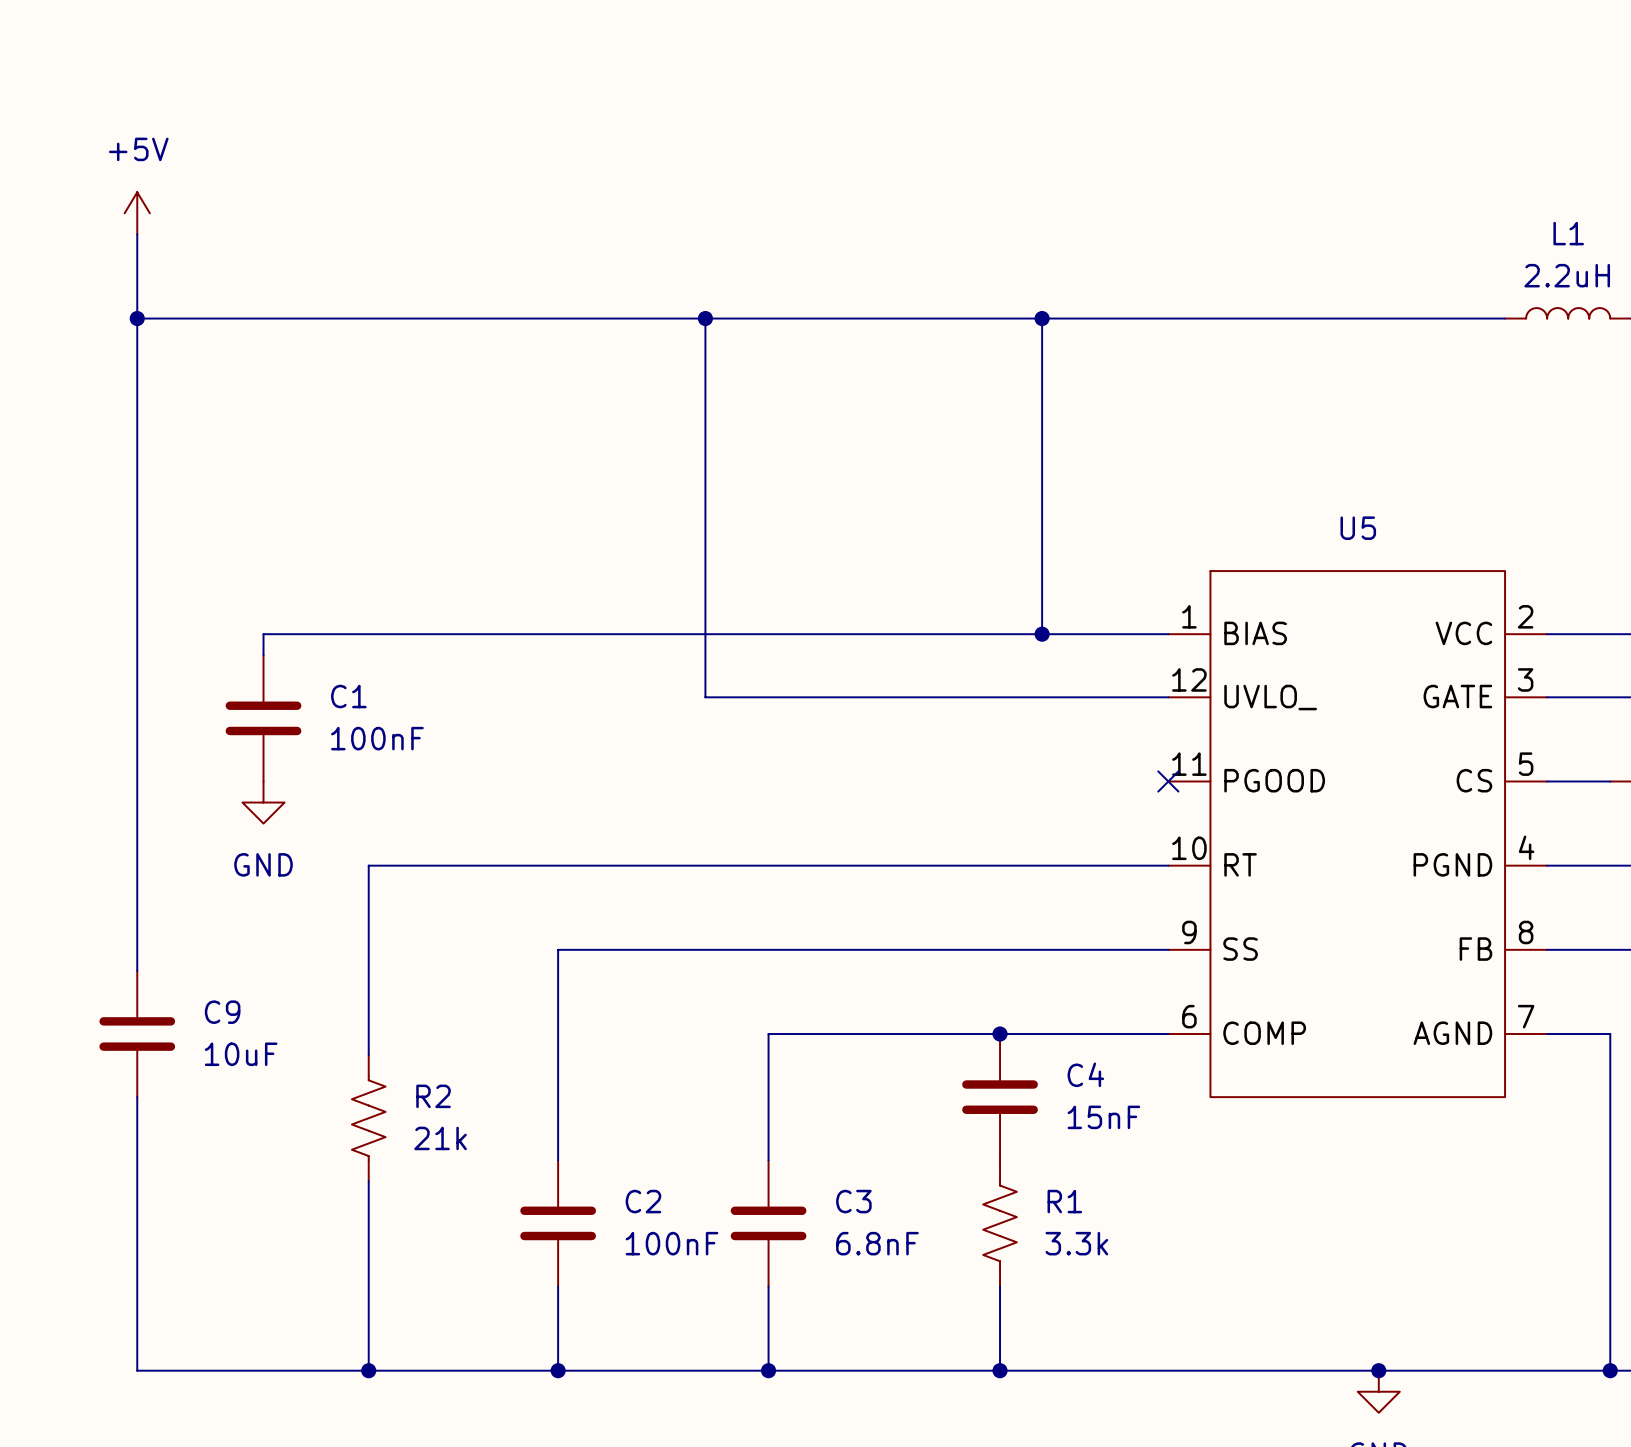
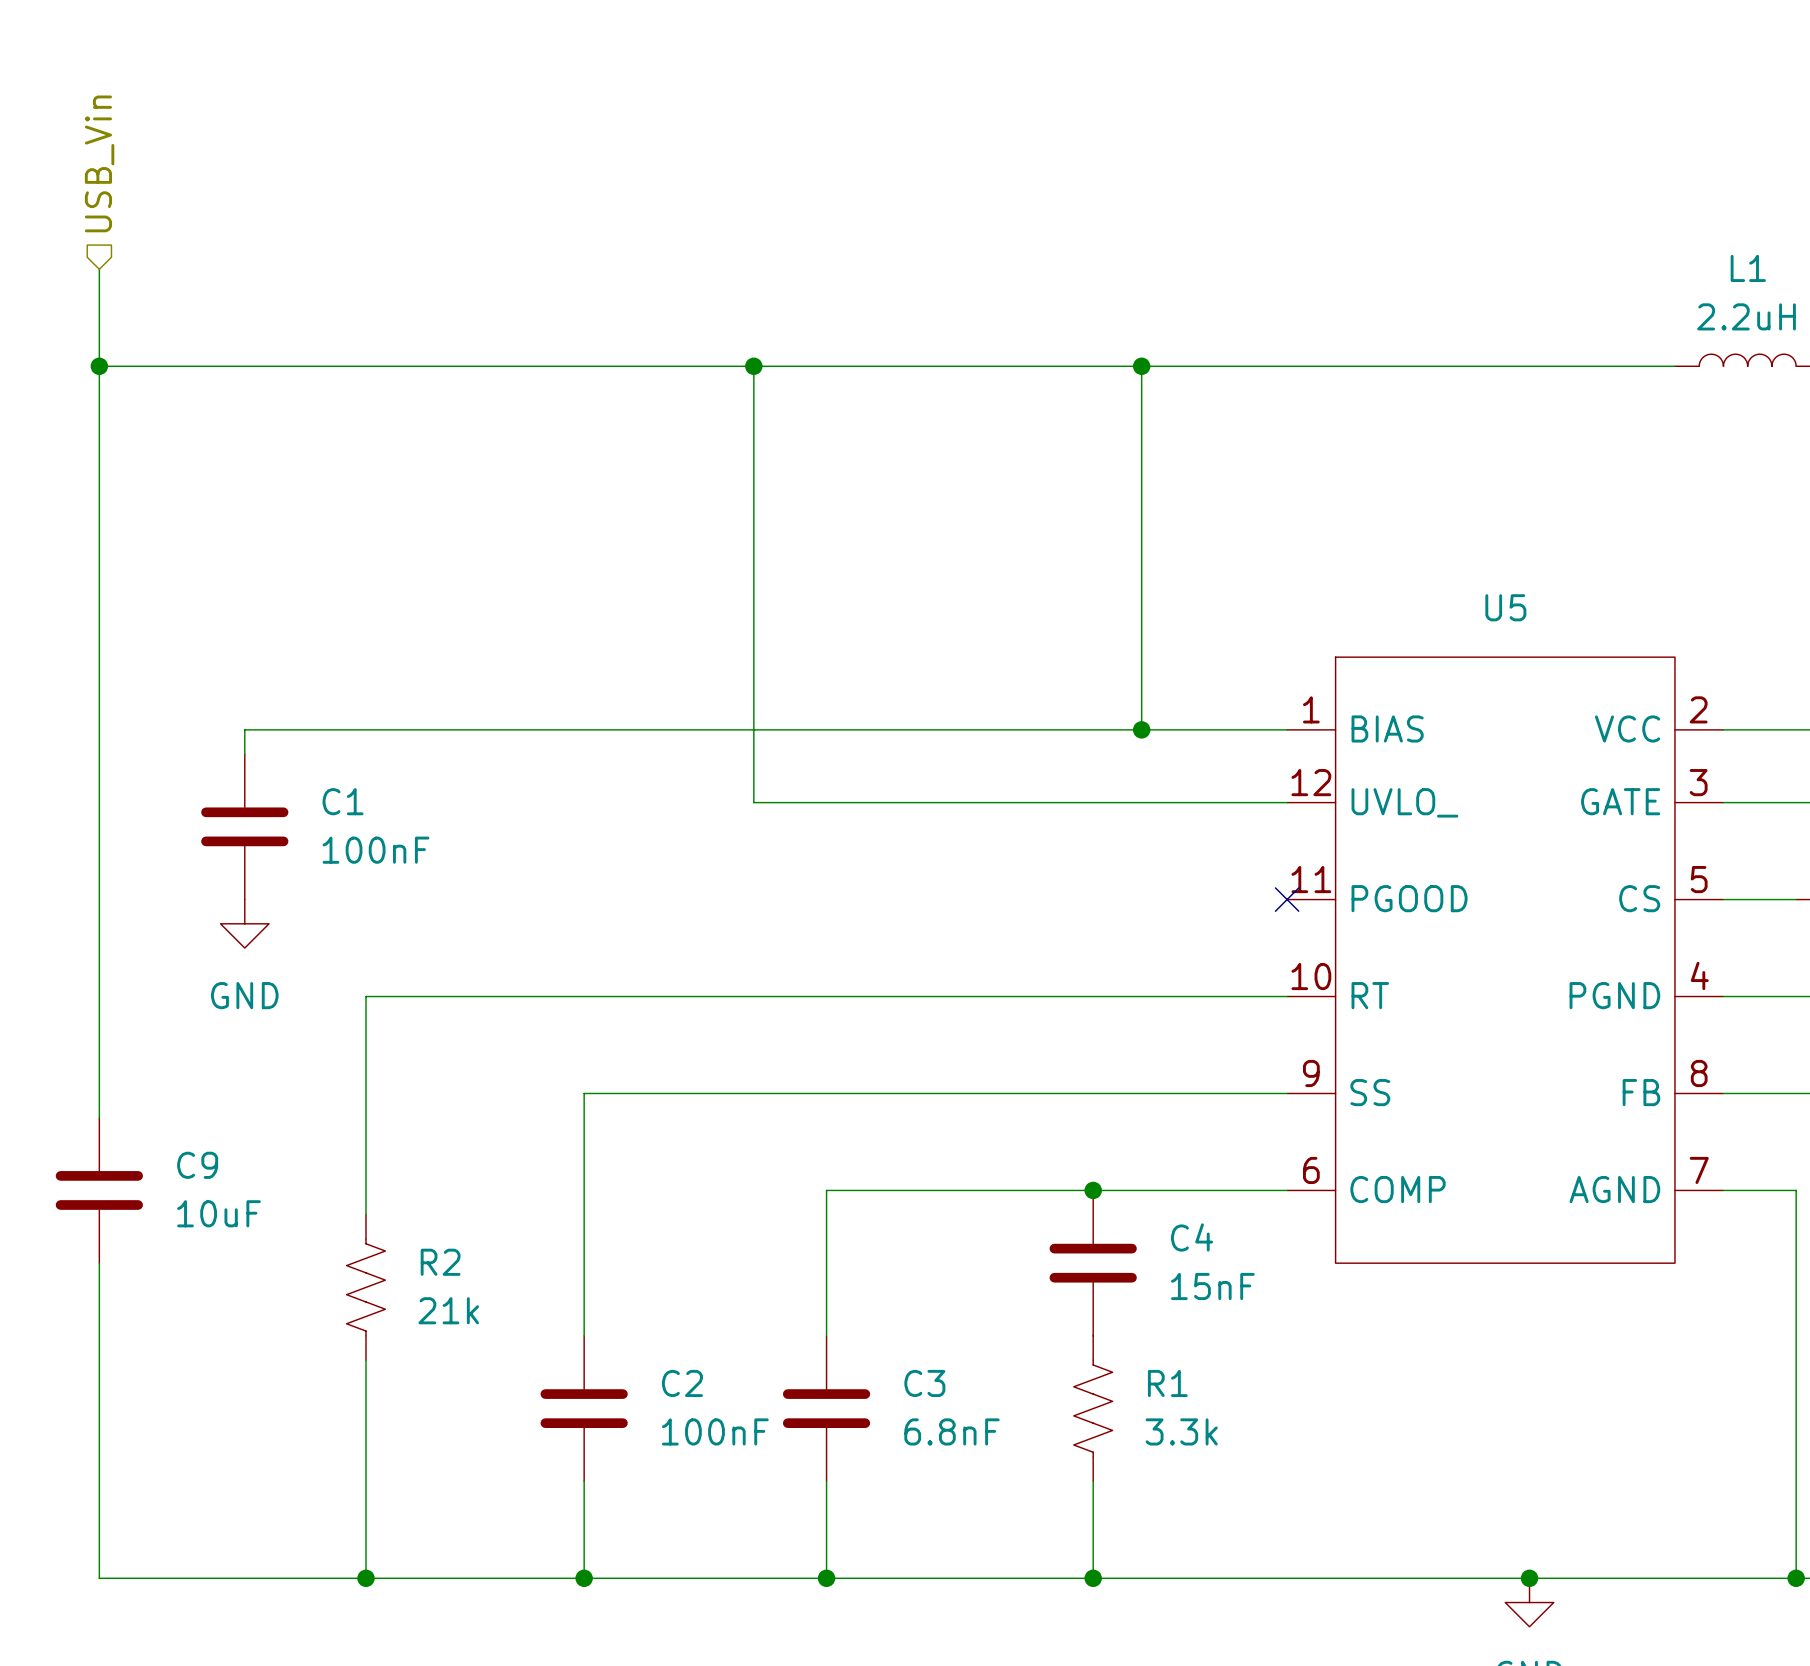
hierarchical label: none -> USB_Vin (99, 163)
power symbol: +5V (137, 213) -> none

